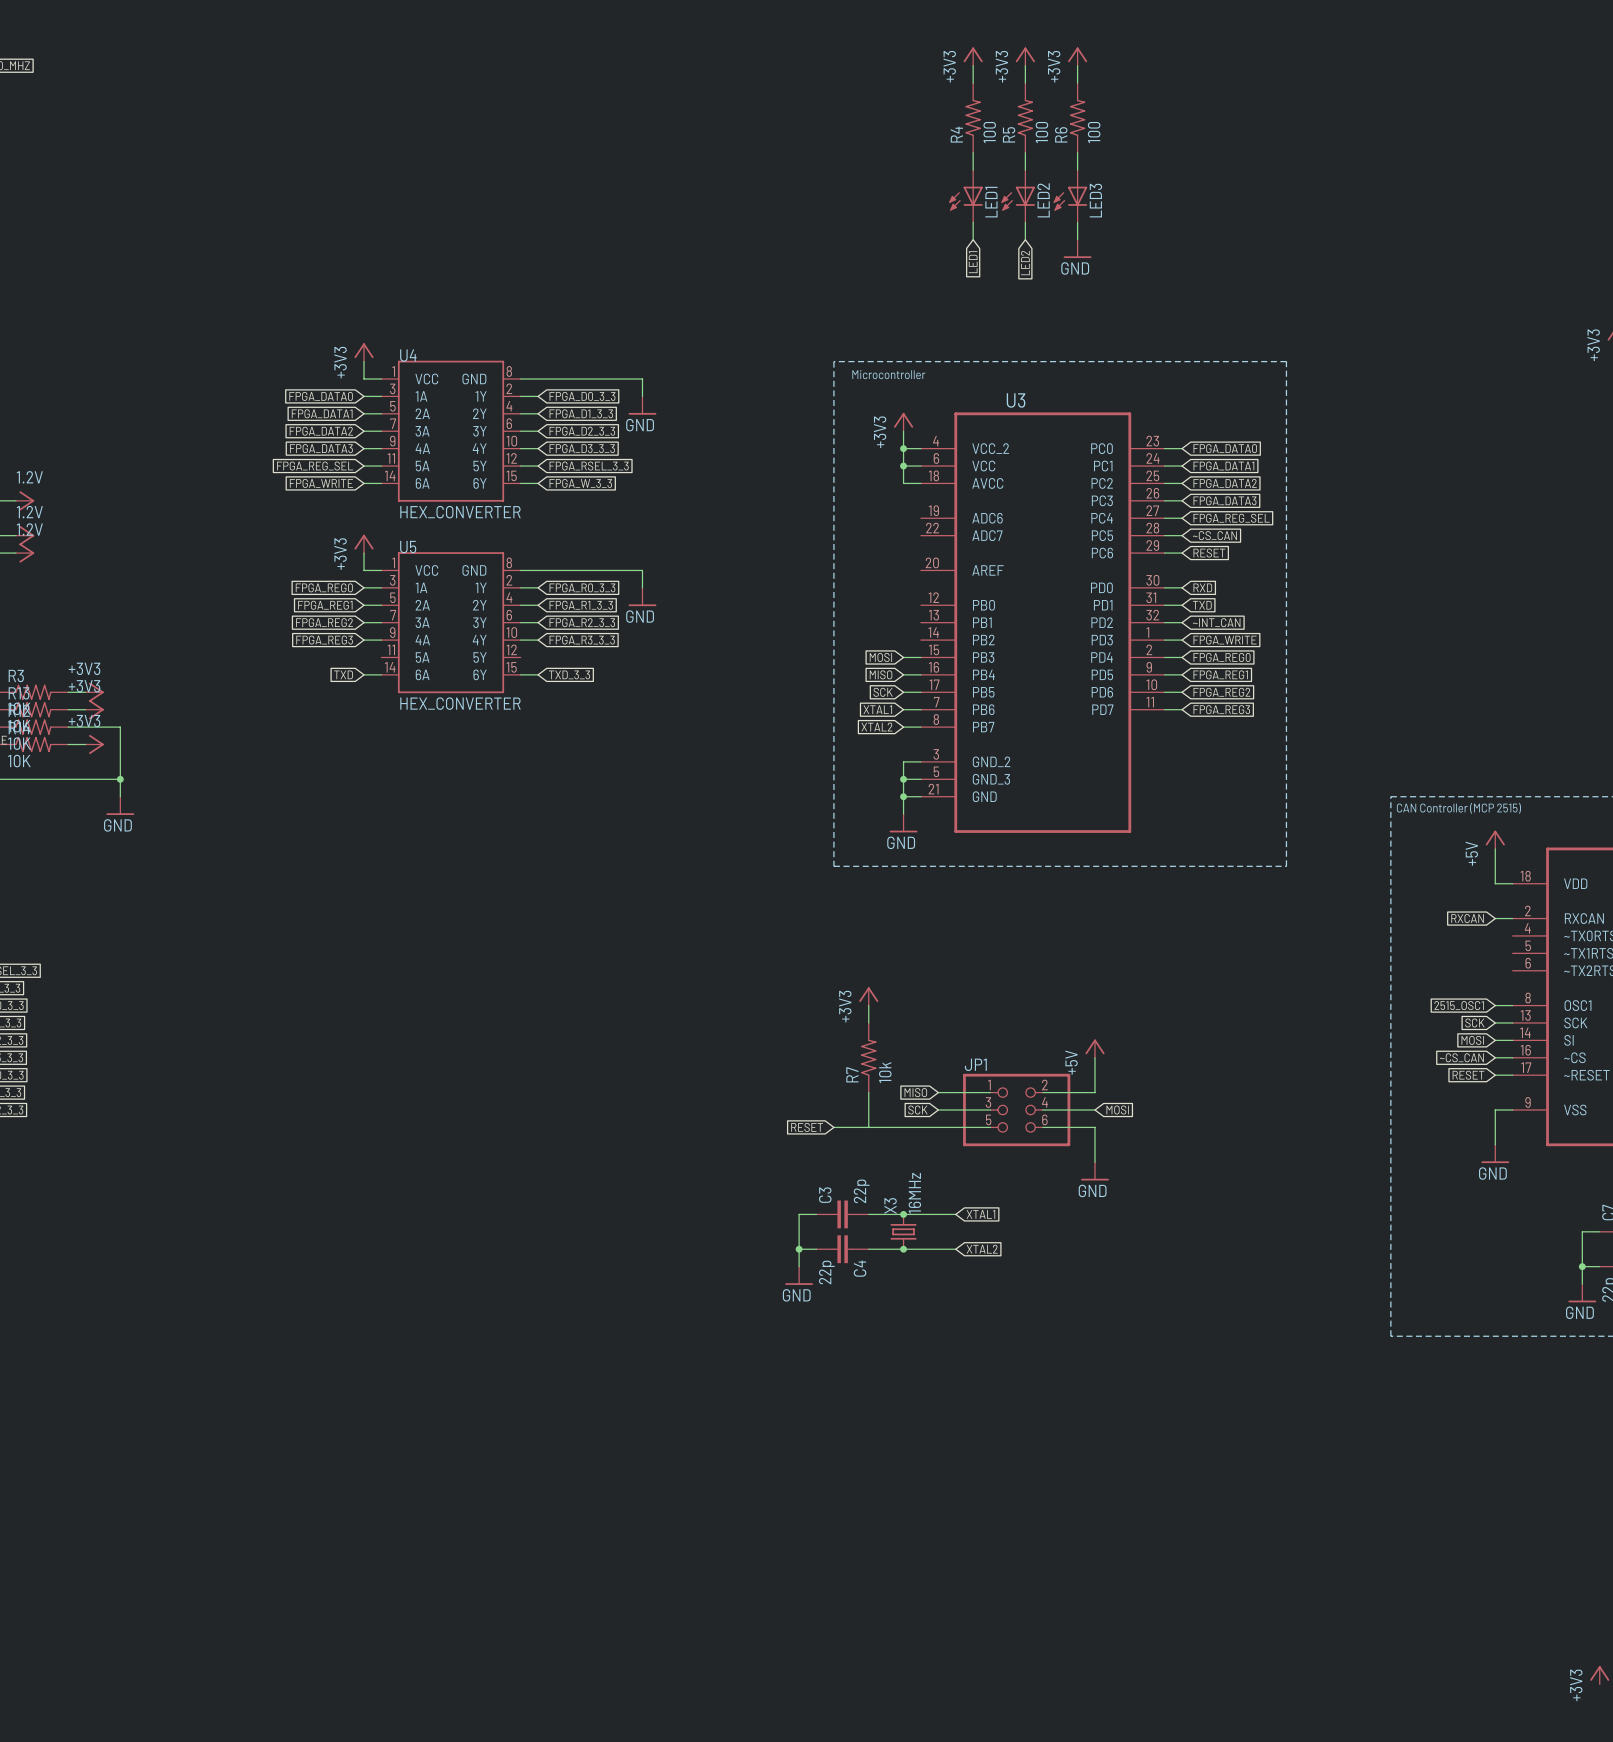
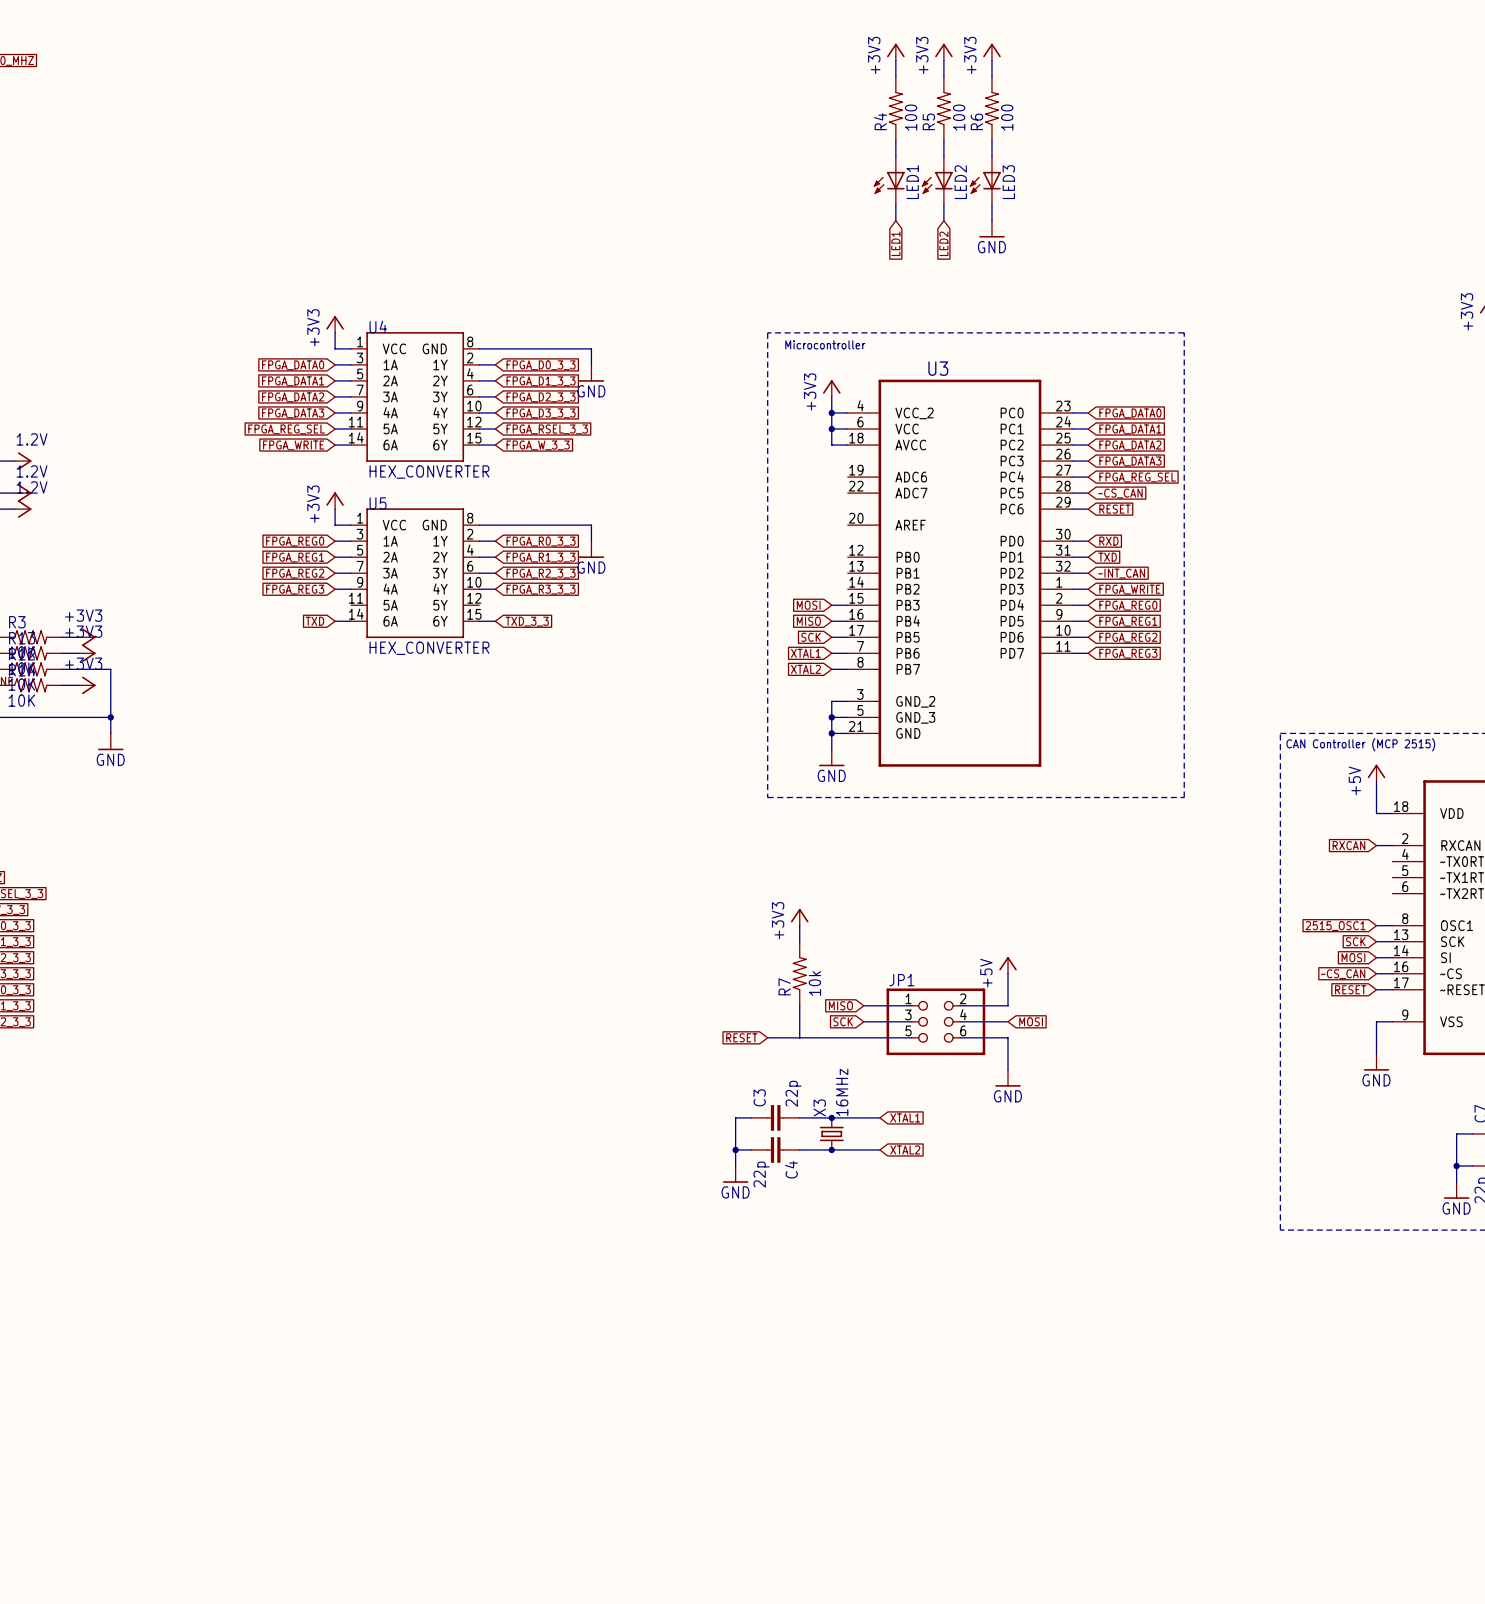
power symbol: +3V3 (1599, 1675) -> none

